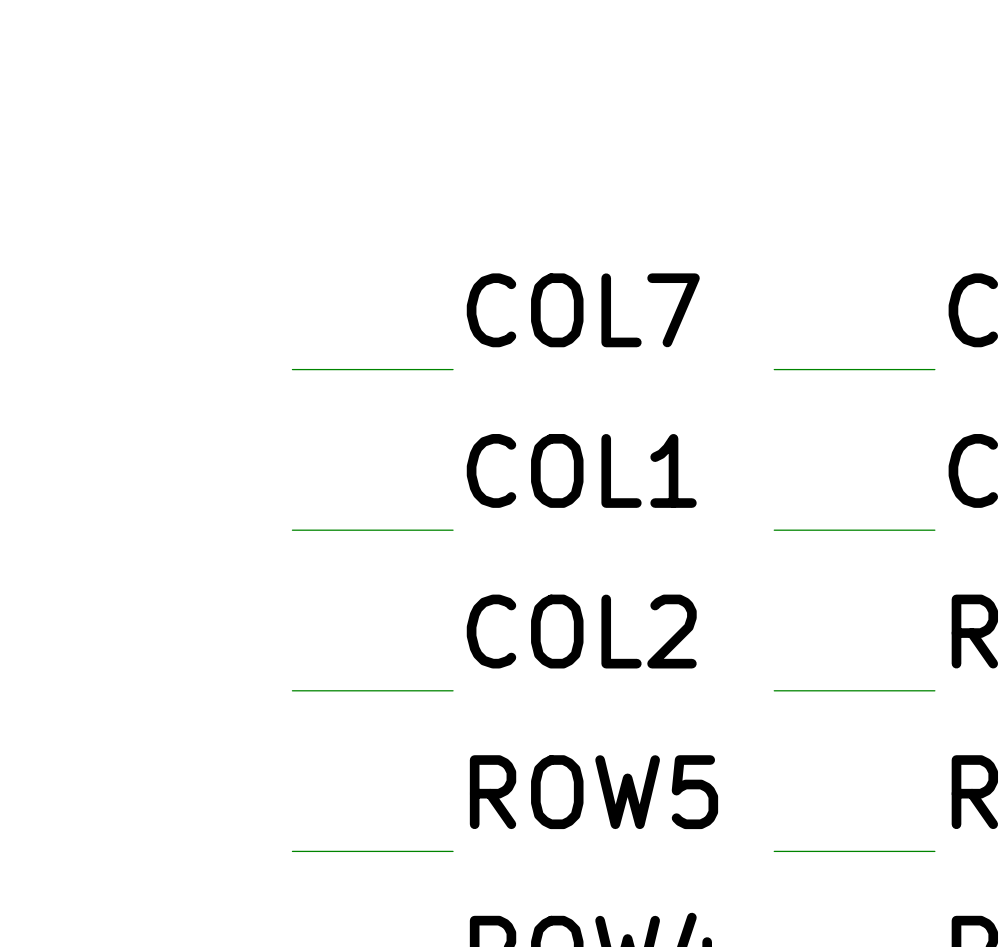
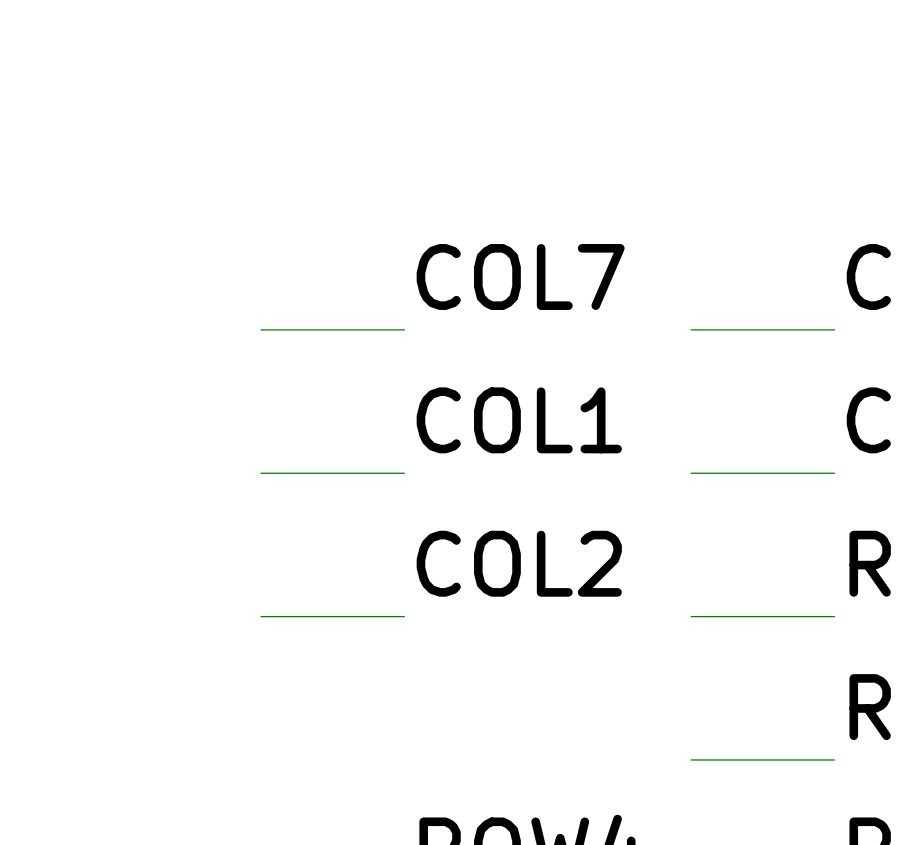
label: ROW5 (593, 792) -> none
wire: (292, 851) (453, 851) -> none

